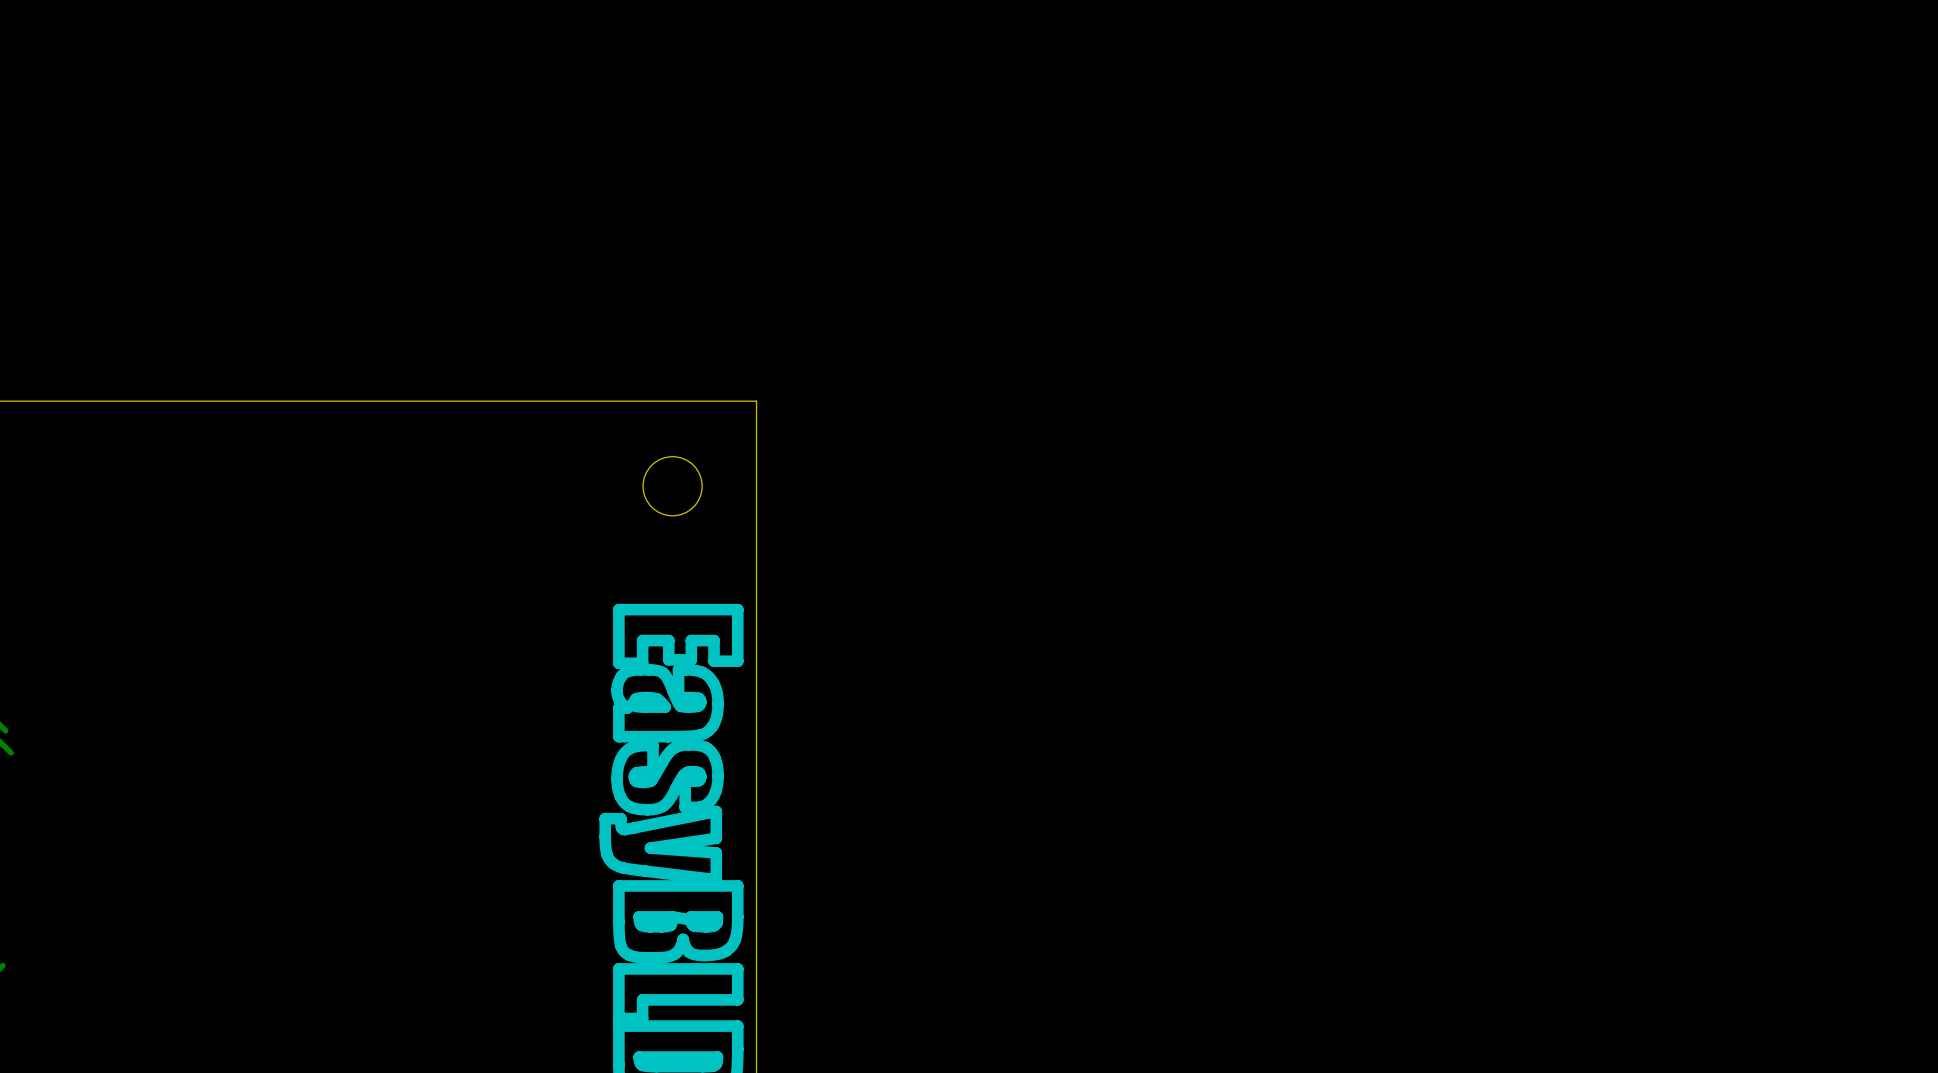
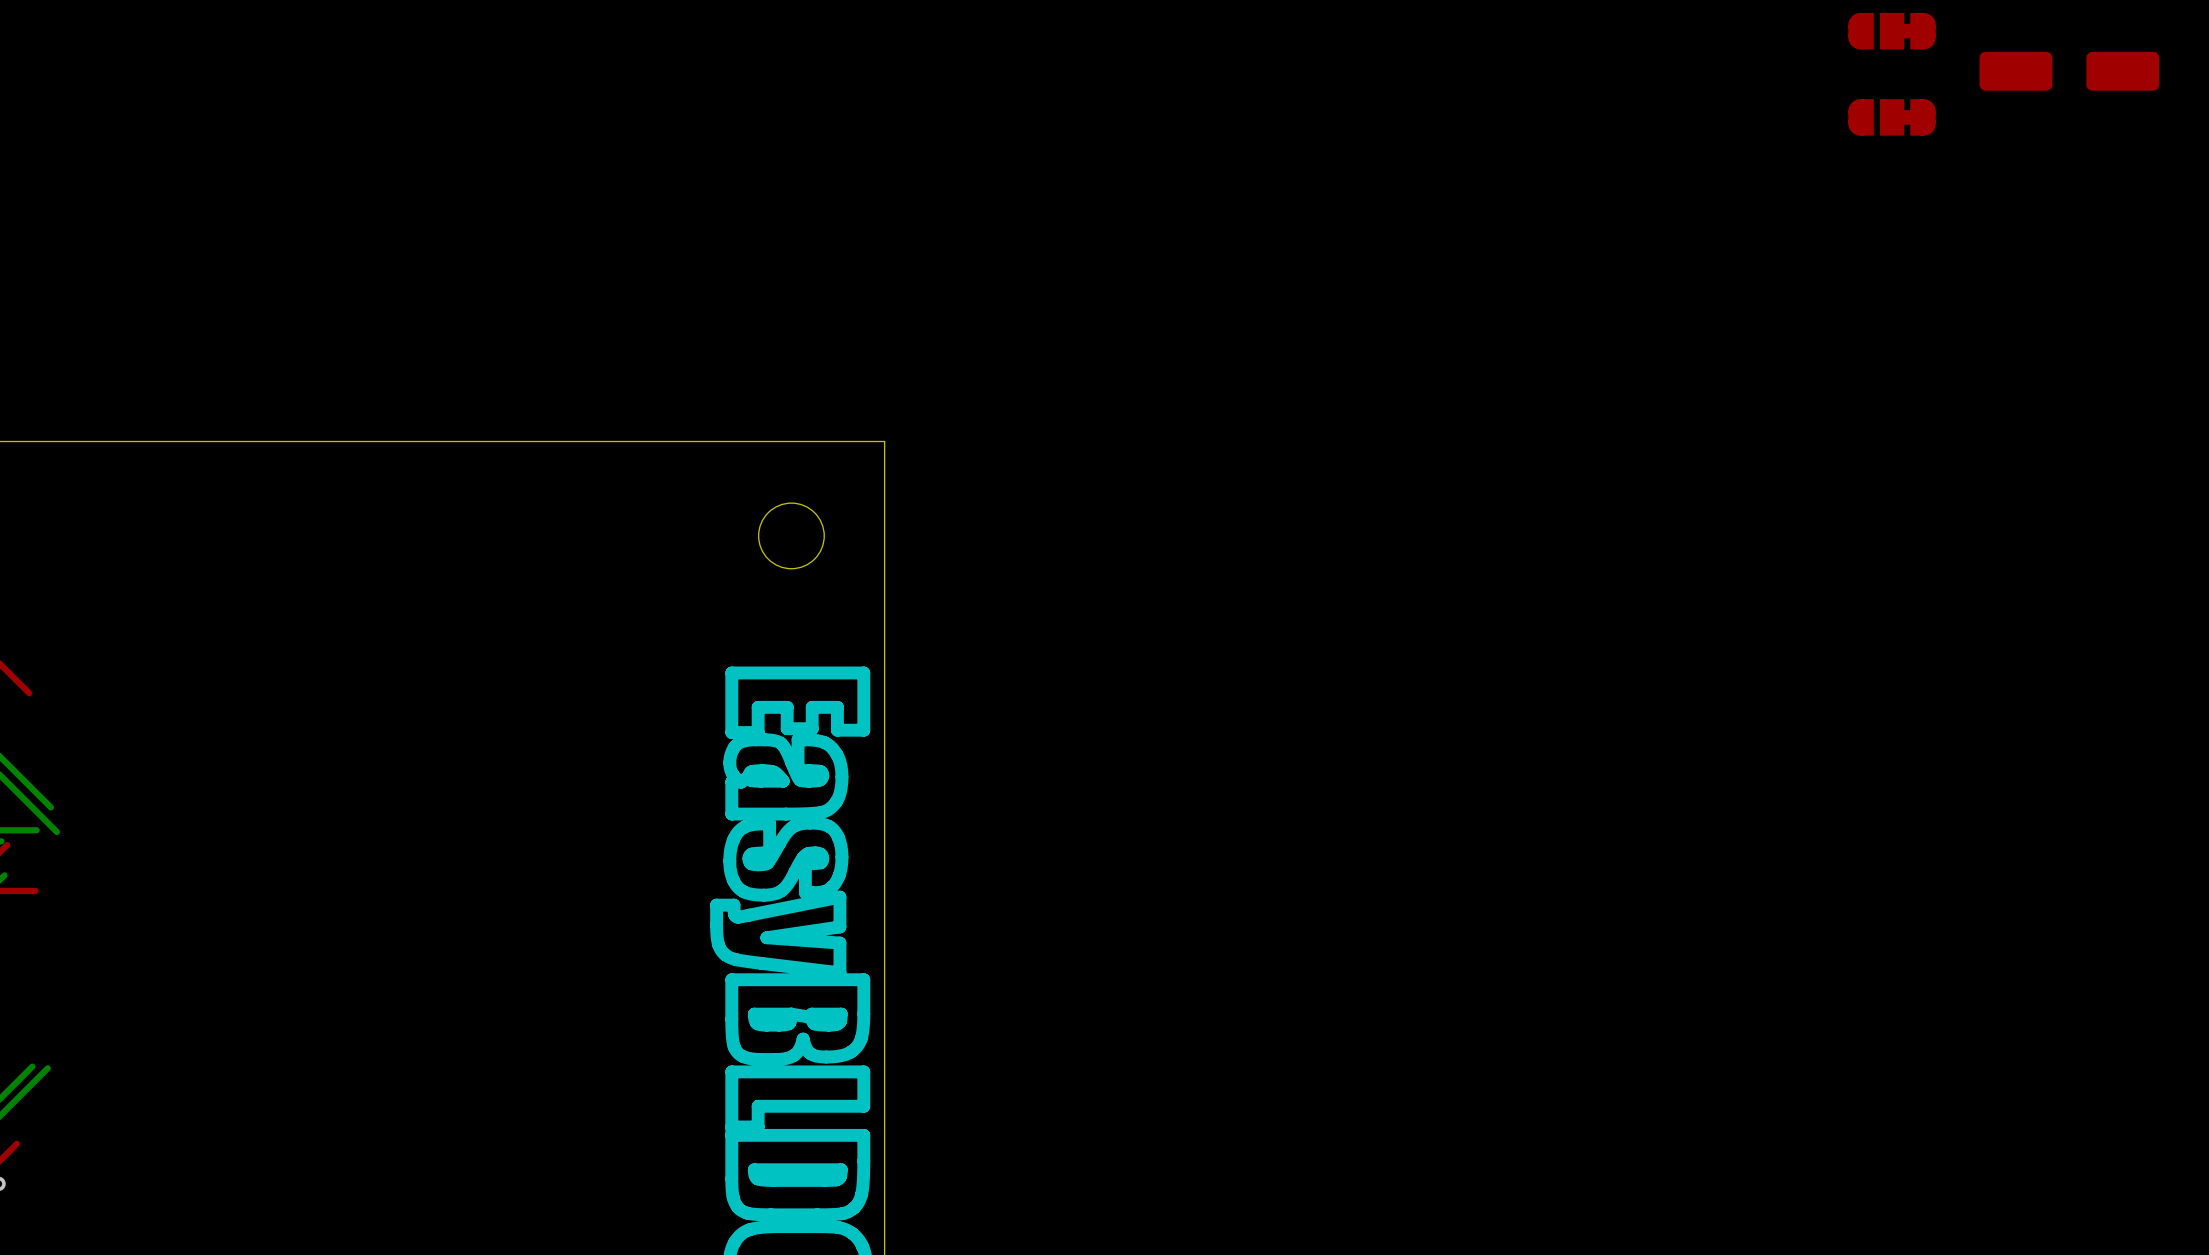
part: none -> (1892, 31)
part: none -> (2069, 71)
part: none -> (1892, 117)

